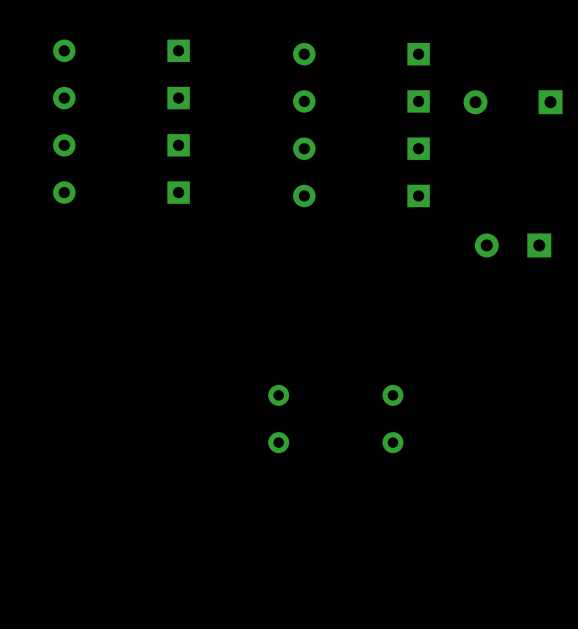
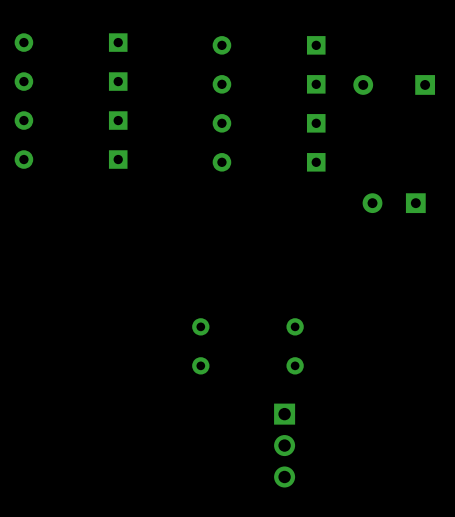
part: none -> (284, 445)

